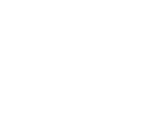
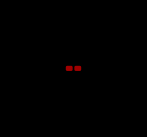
part: none -> (73, 68)

